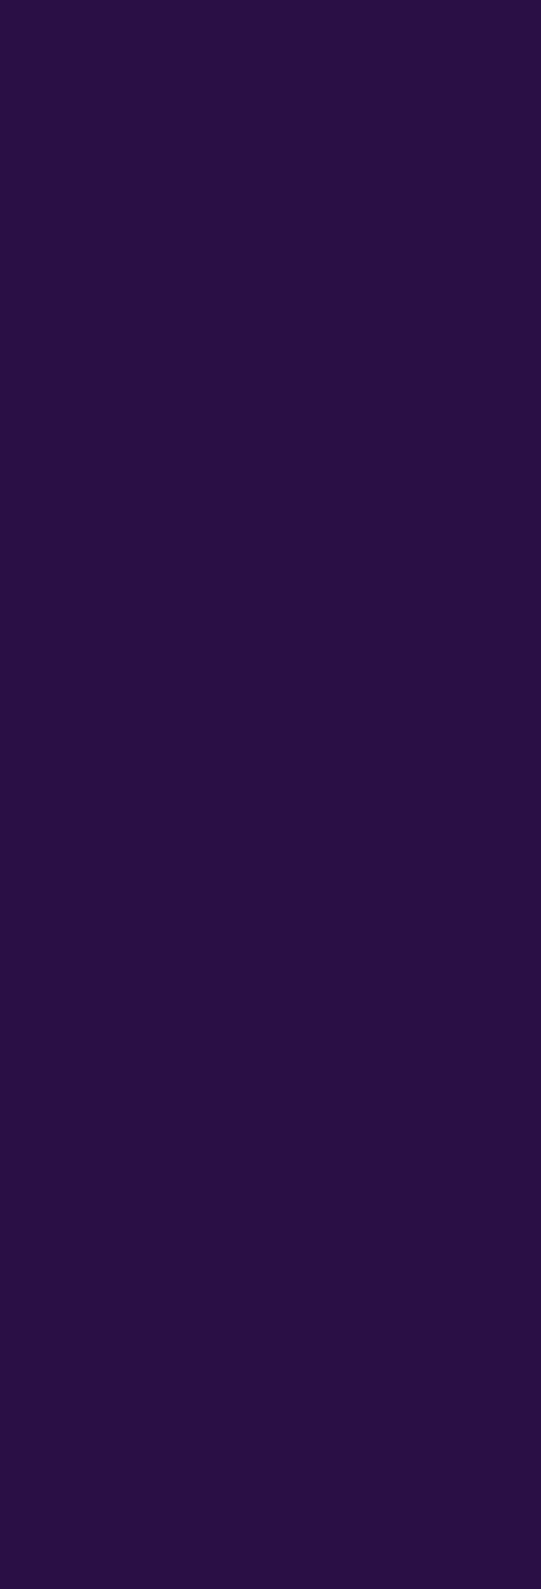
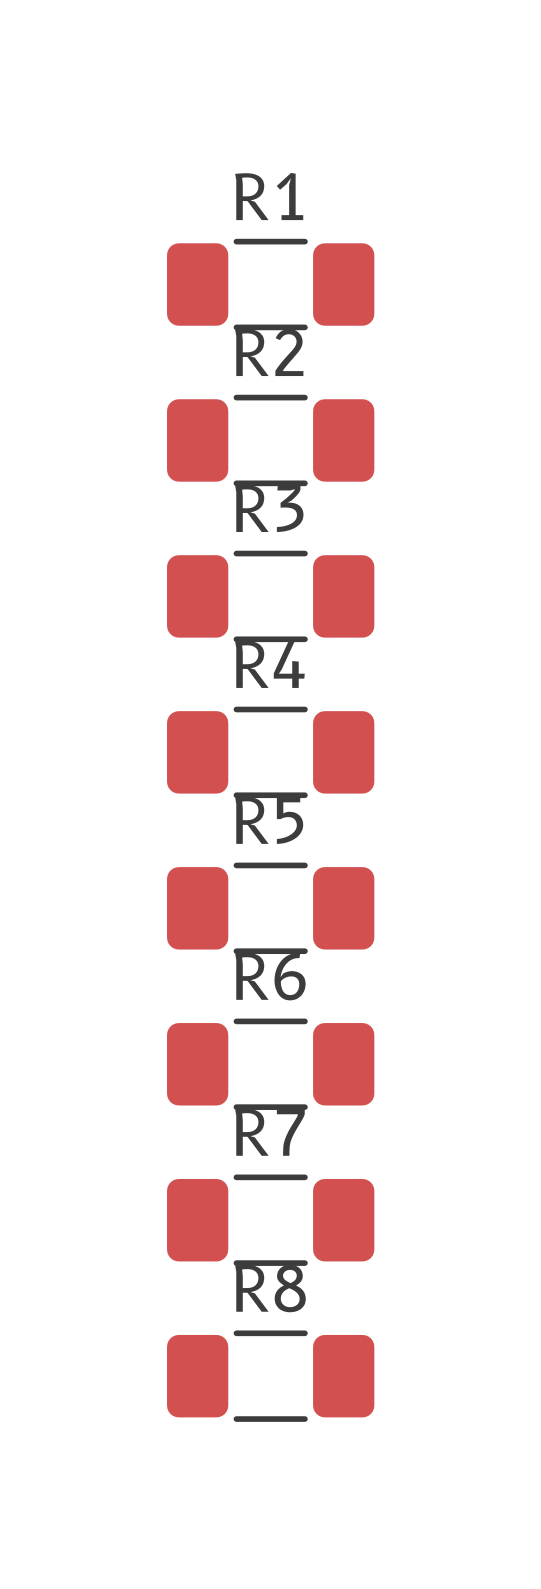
R1: none -> (270, 284)
R2: none -> (270, 440)
R3: none -> (270, 596)
R4: none -> (270, 752)
R5: none -> (270, 908)
R6: none -> (270, 1064)
R7: none -> (270, 1220)
R8: none -> (270, 1376)

